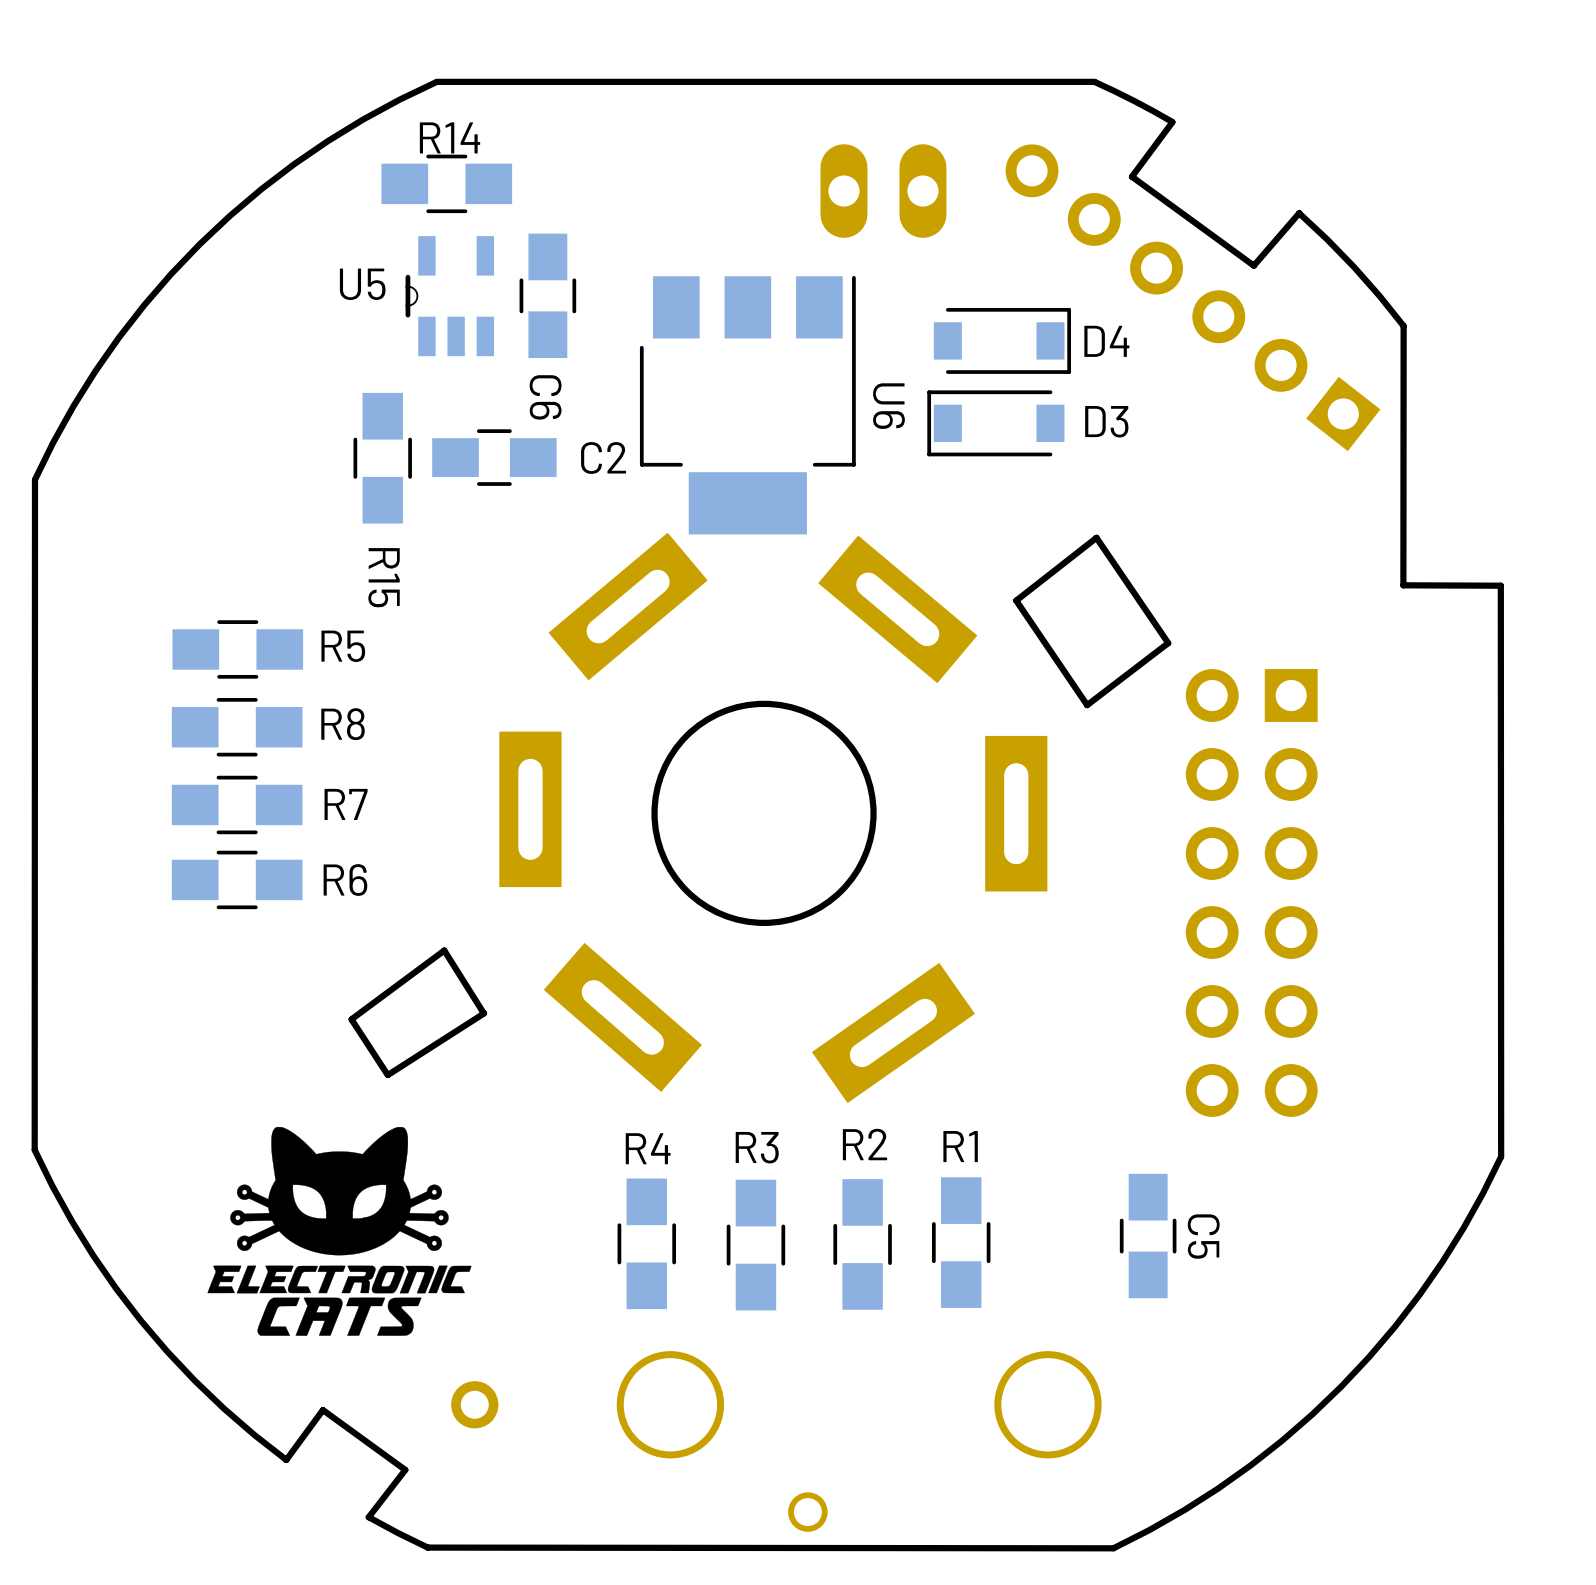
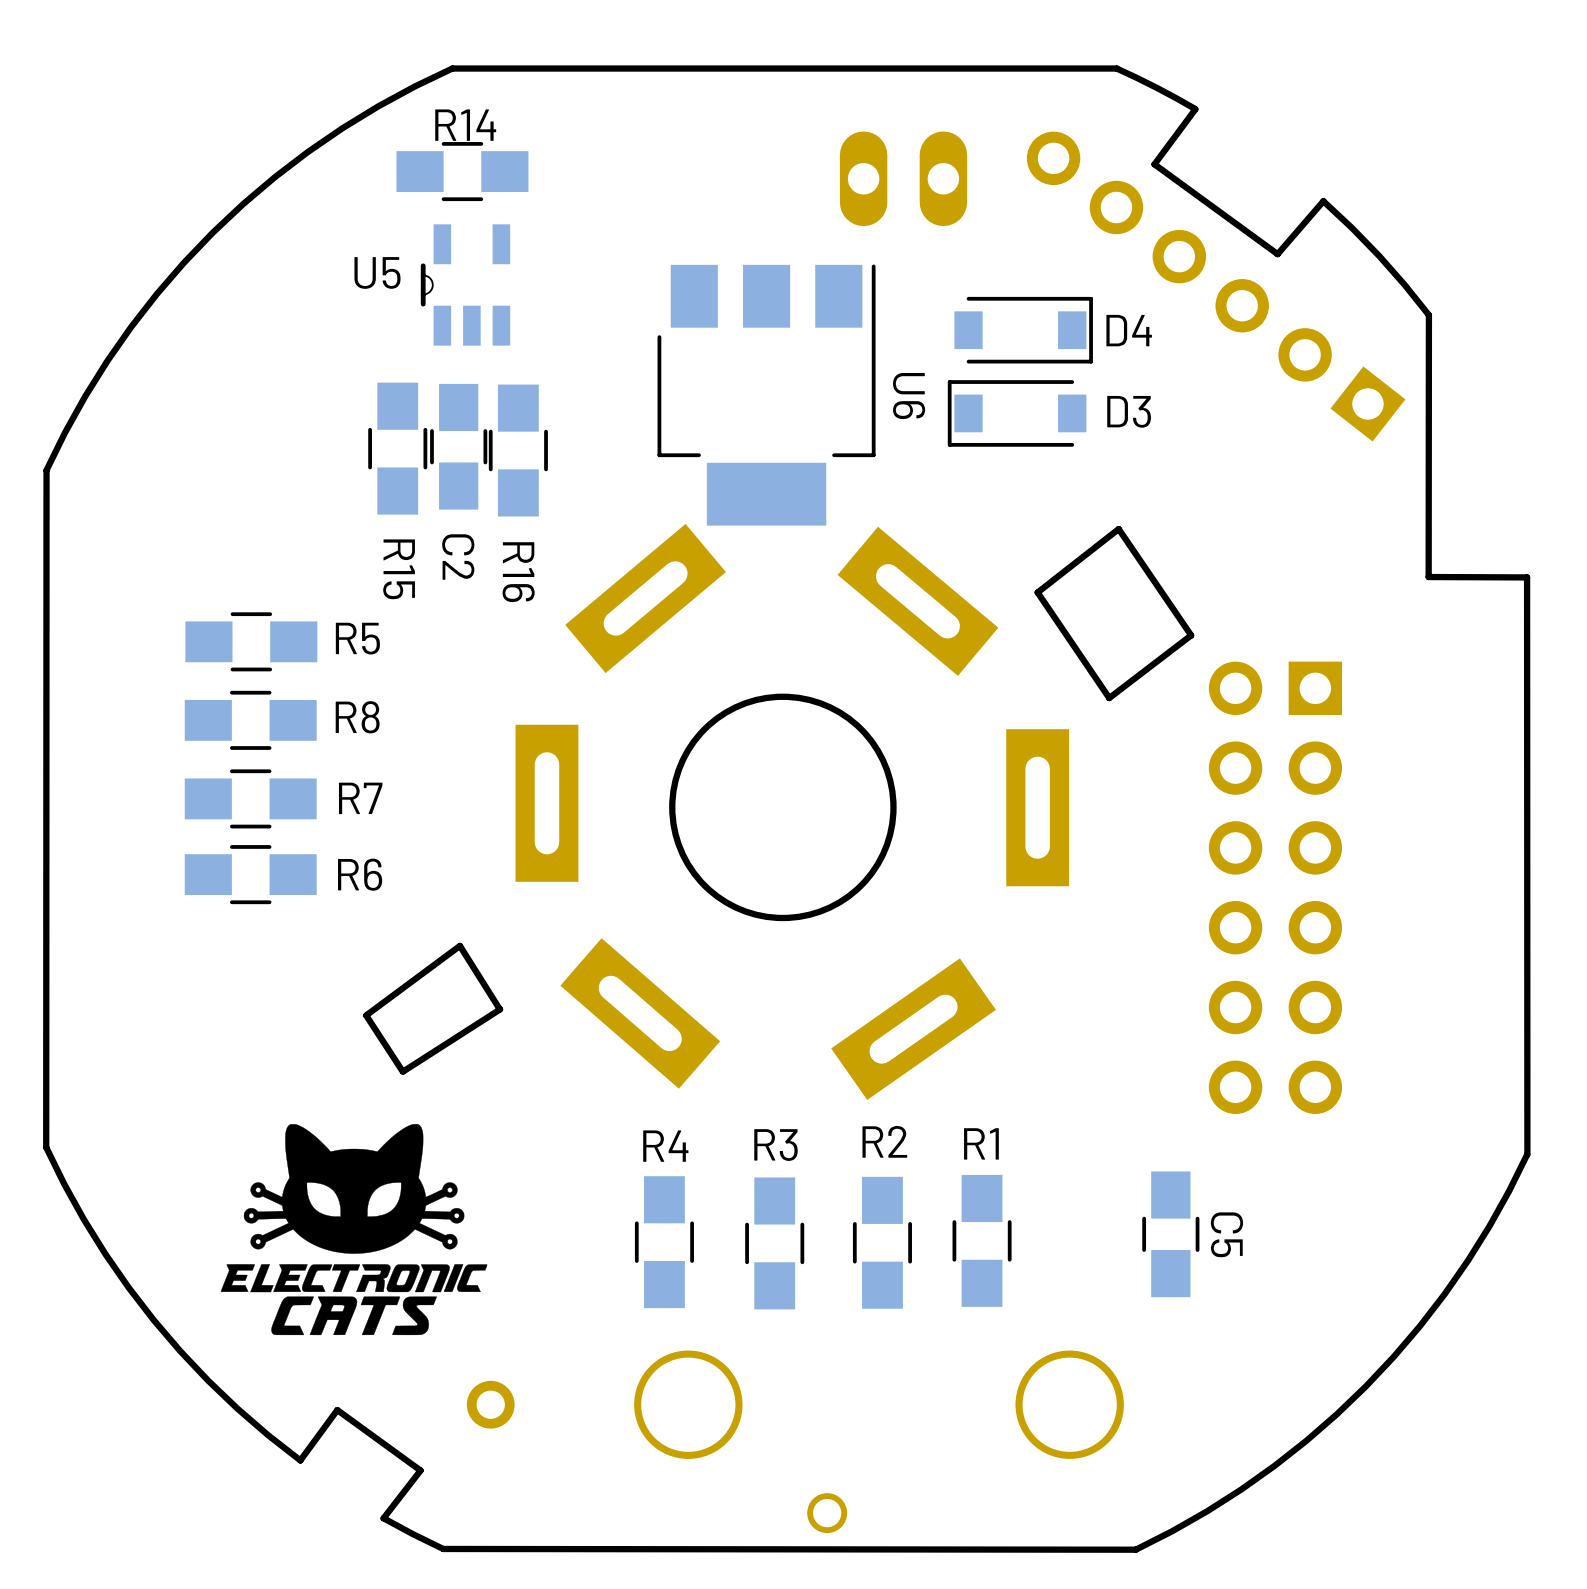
C6: (547, 295) -> none
C2 rotation: 0° (494, 457) -> 90° clockwise (458, 446)
R16: none -> (518, 450)

